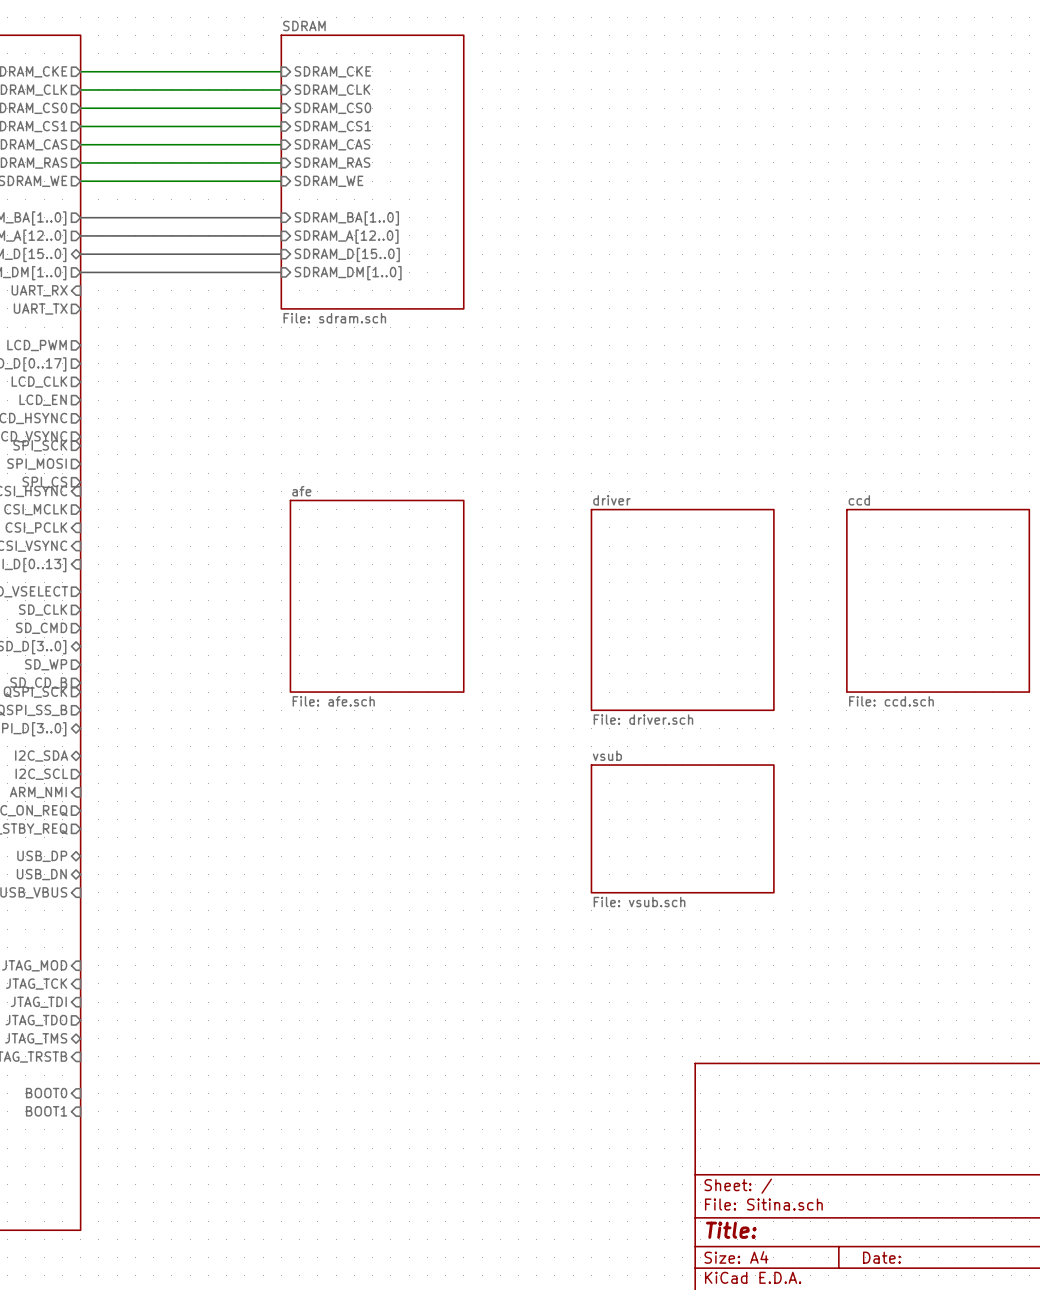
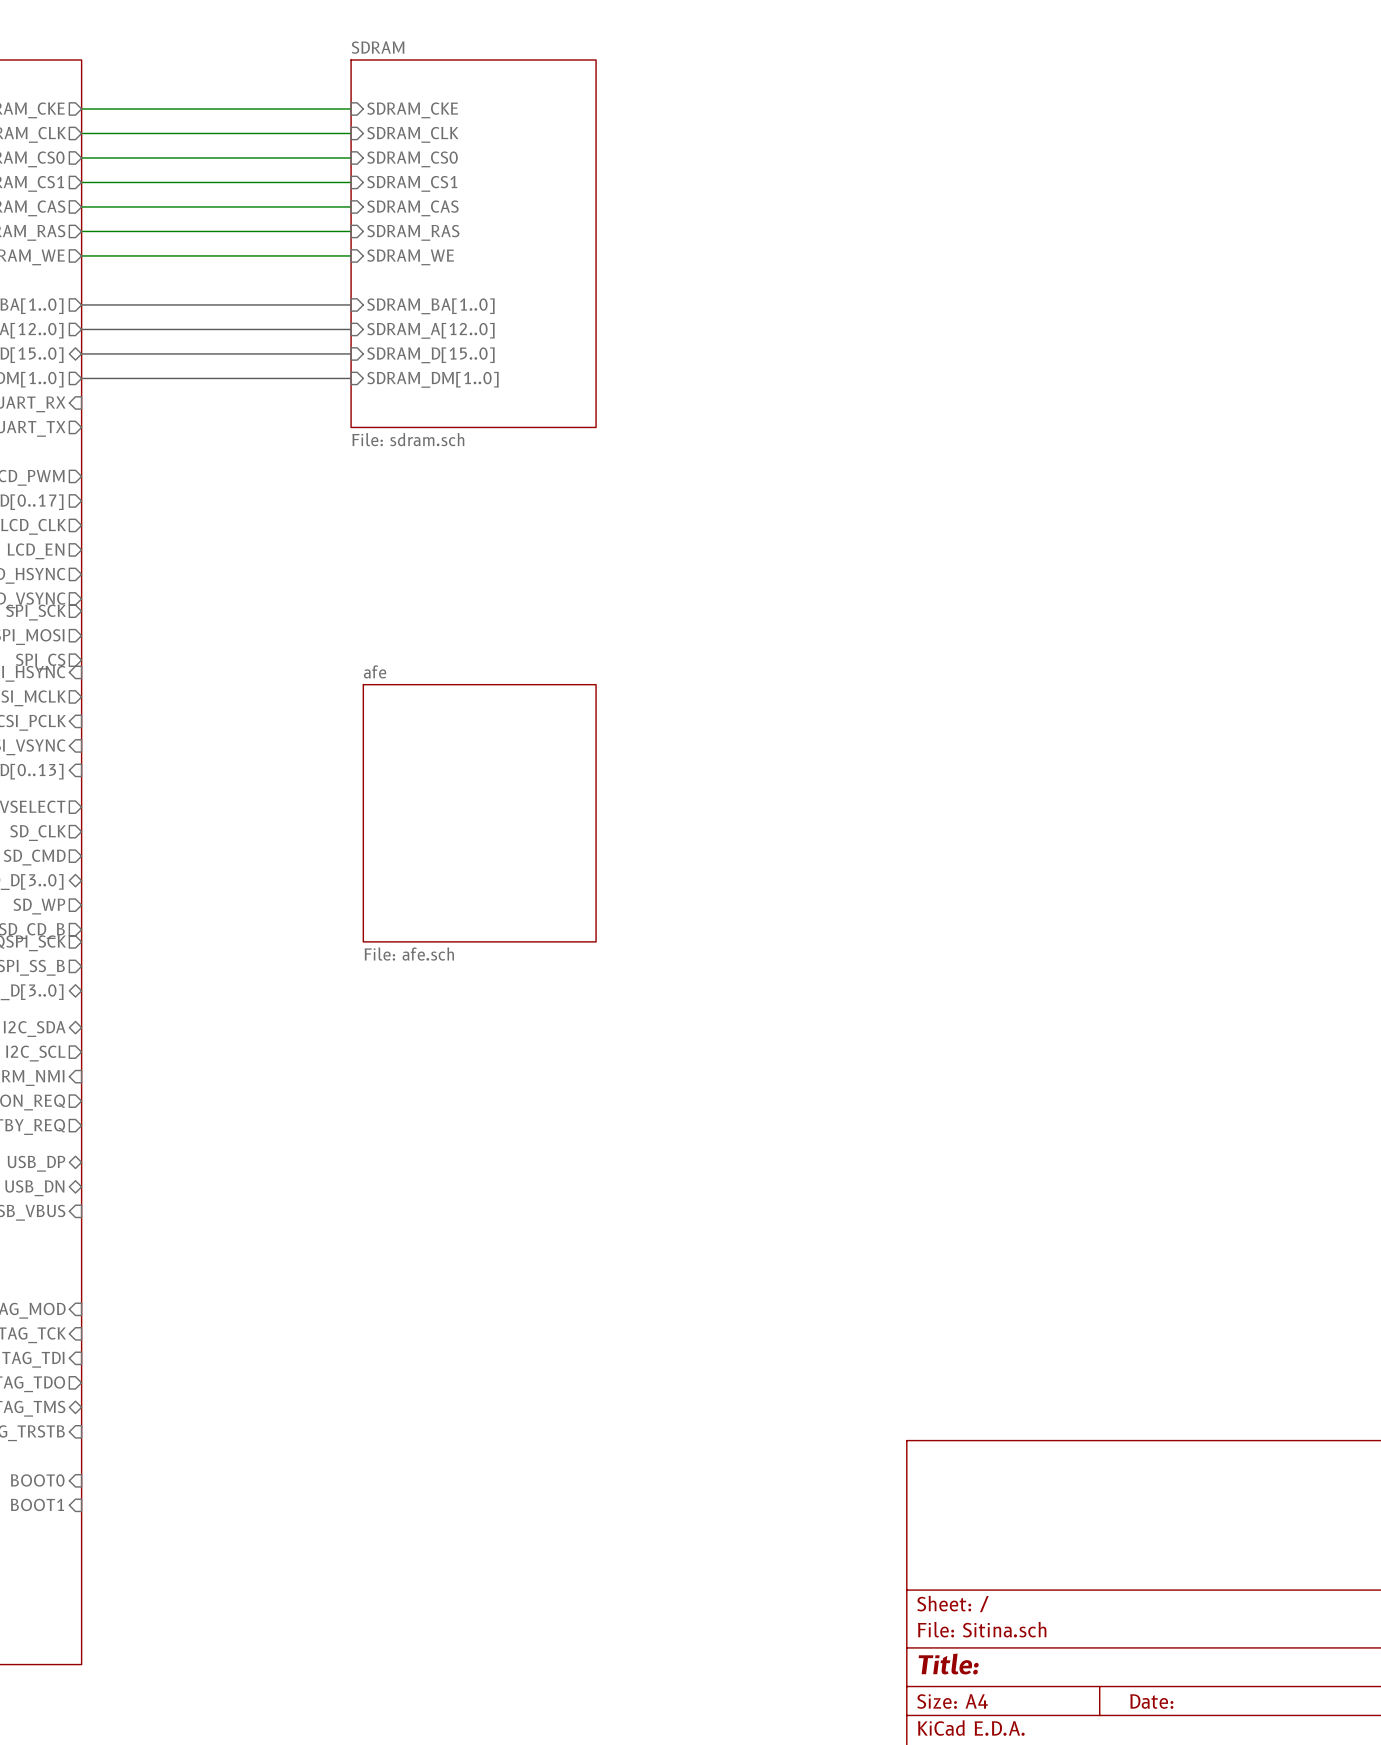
sheet ccd: File: ccd.sch (938, 600) -> none
sheet driver: File: driver.sch (682, 609) -> none
sheet vsub: File: vsub.sch (682, 828) -> none

